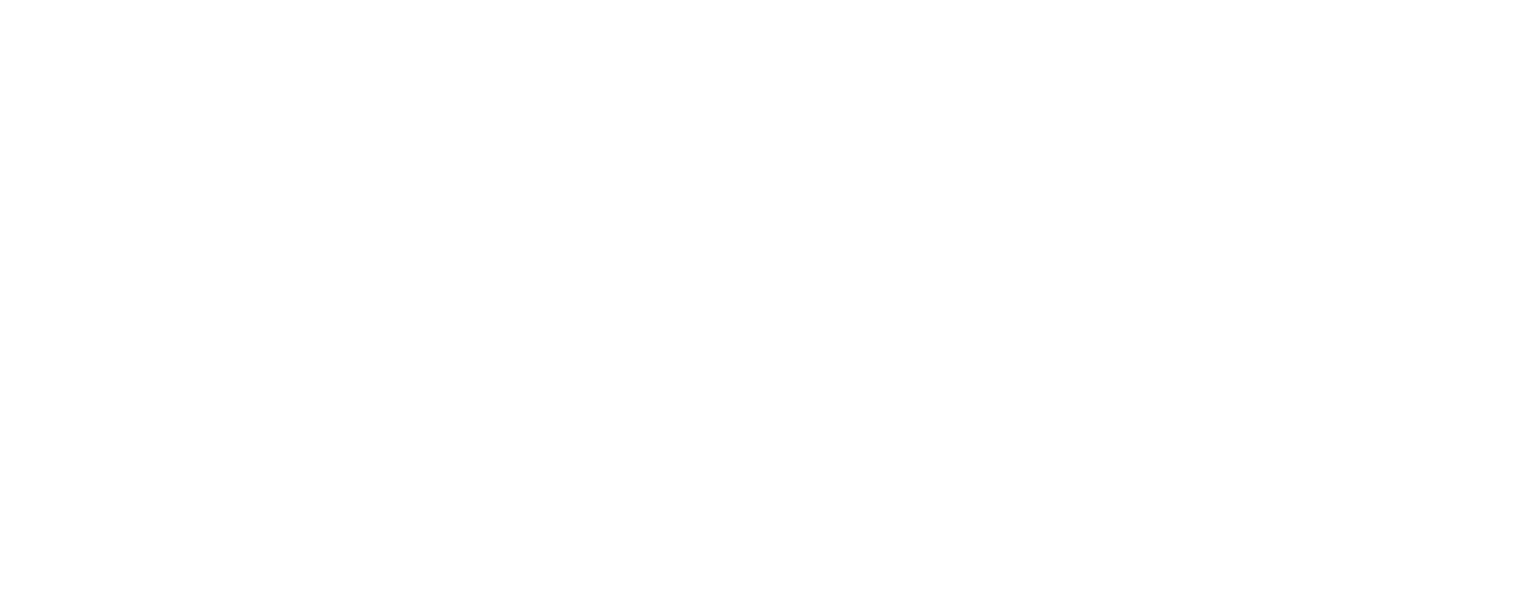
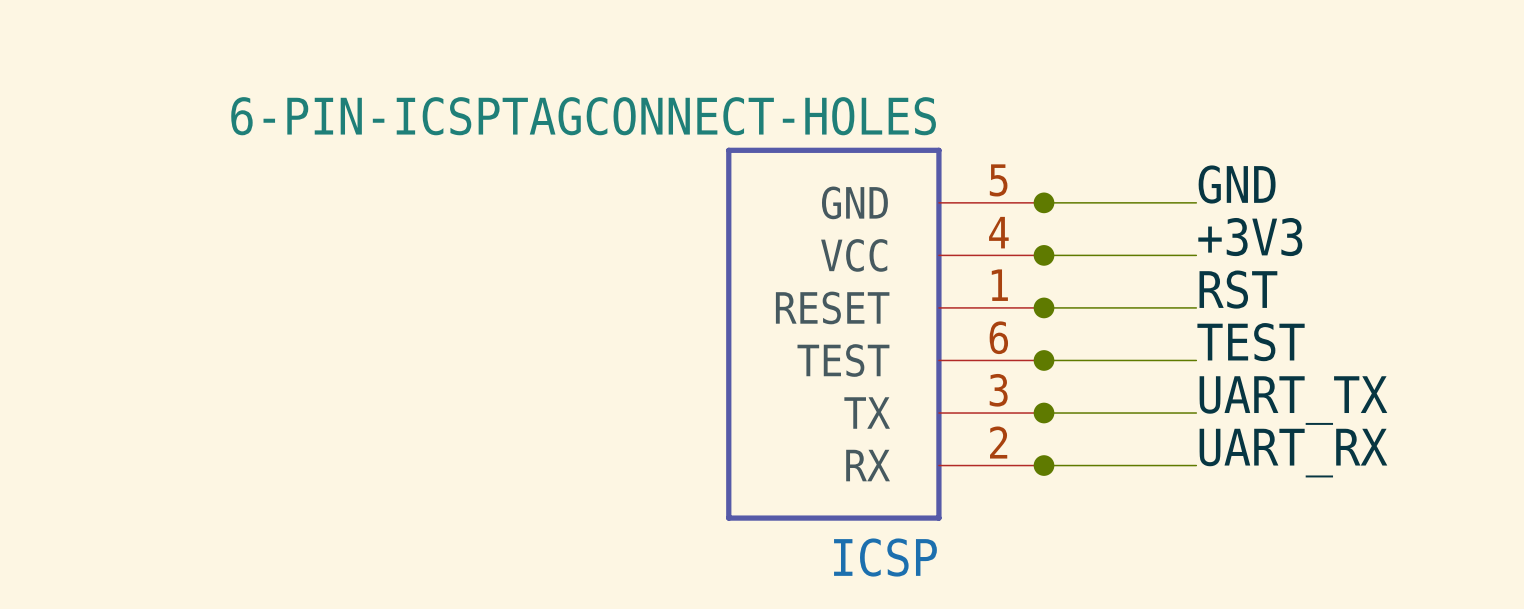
label: none -> GND (1237, 184)
wire: none -> (1038, 202) (1196, 202)
junction: none -> (1044, 202)
label: none -> +3V3 (1250, 237)
wire: none -> (1038, 255) (1196, 255)
junction: none -> (1044, 255)
label: none -> RST (1238, 289)
wire: none -> (1038, 307) (1196, 307)
junction: none -> (1044, 307)
ICSP: none -> 6-PIN-ICSPTAGCONNECT-HOLES (885, 334)
label: none -> TEST (1251, 342)
wire: none -> (1038, 360) (1196, 360)
junction: none -> (1044, 360)
label: none -> UART_TX (1293, 400)
wire: none -> (1038, 413) (1196, 413)
junction: none -> (1044, 413)
label: none -> UART_RX (1293, 453)
wire: none -> (1038, 465) (1196, 465)
junction: none -> (1044, 465)

